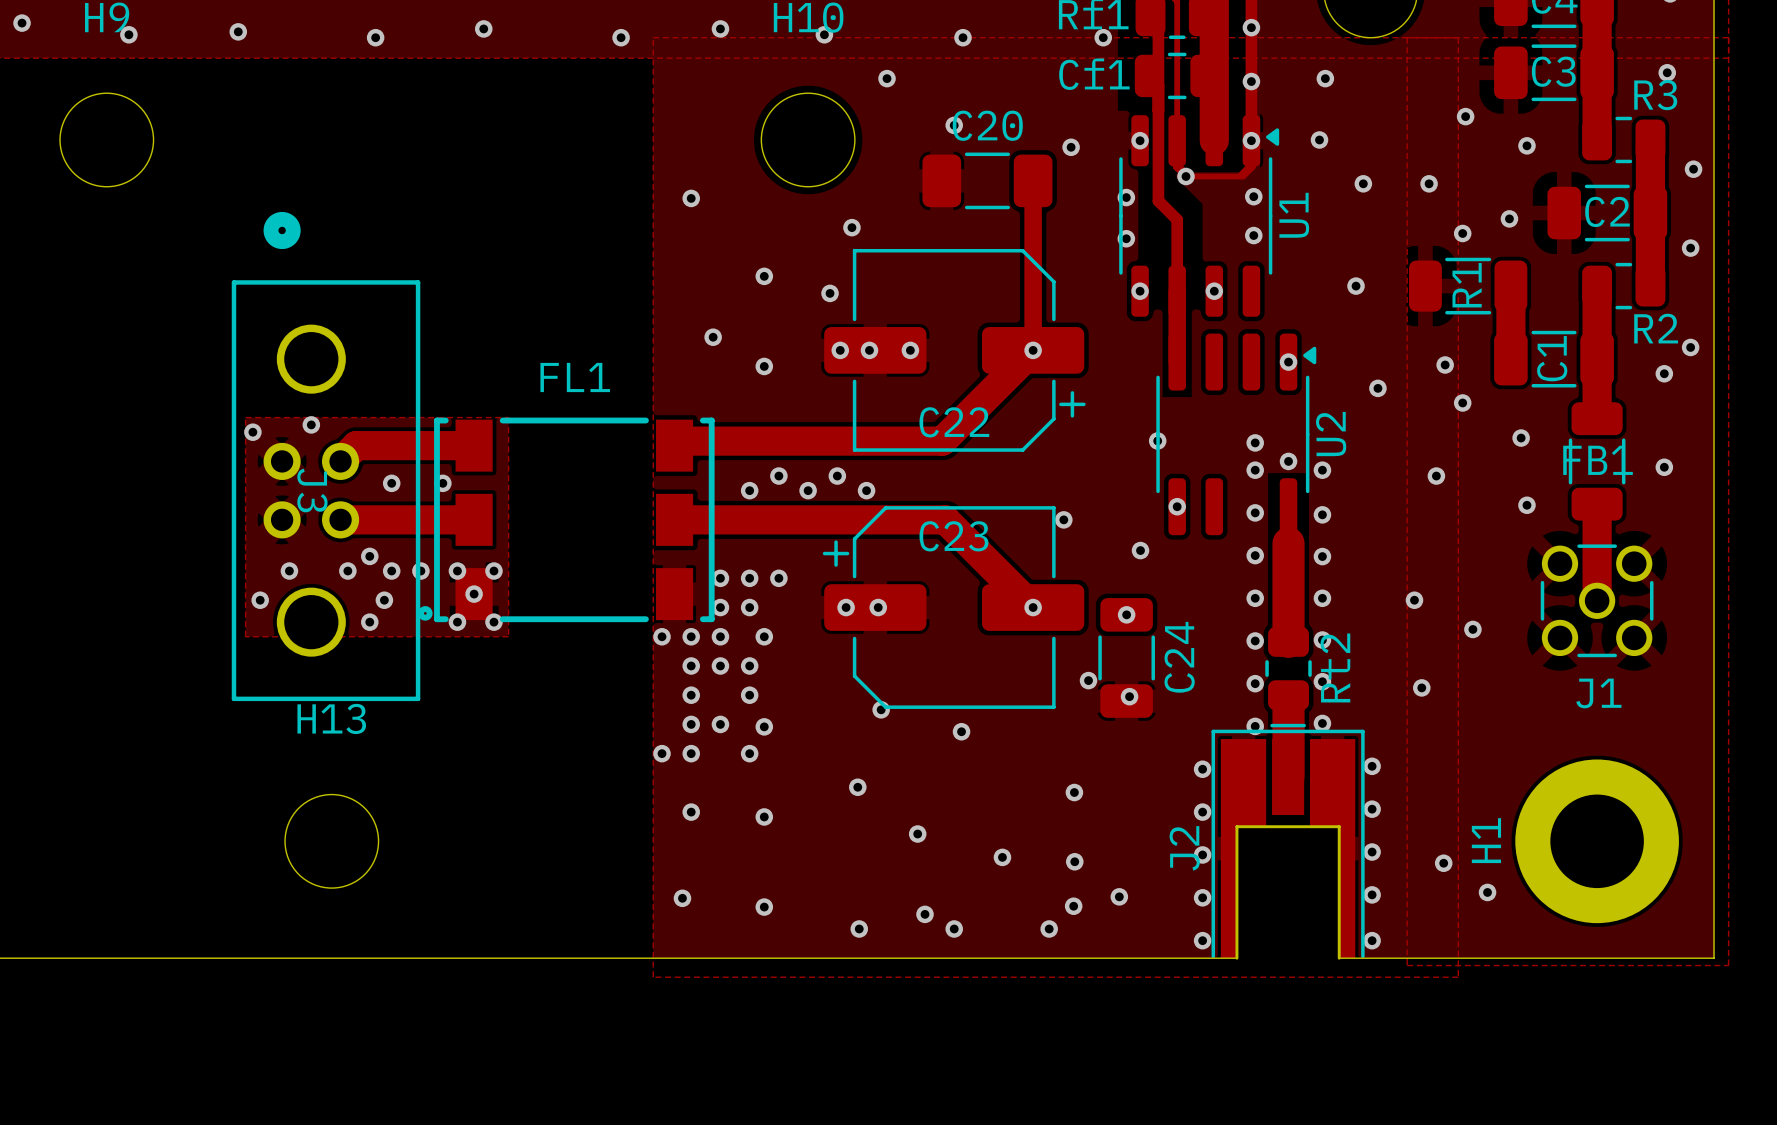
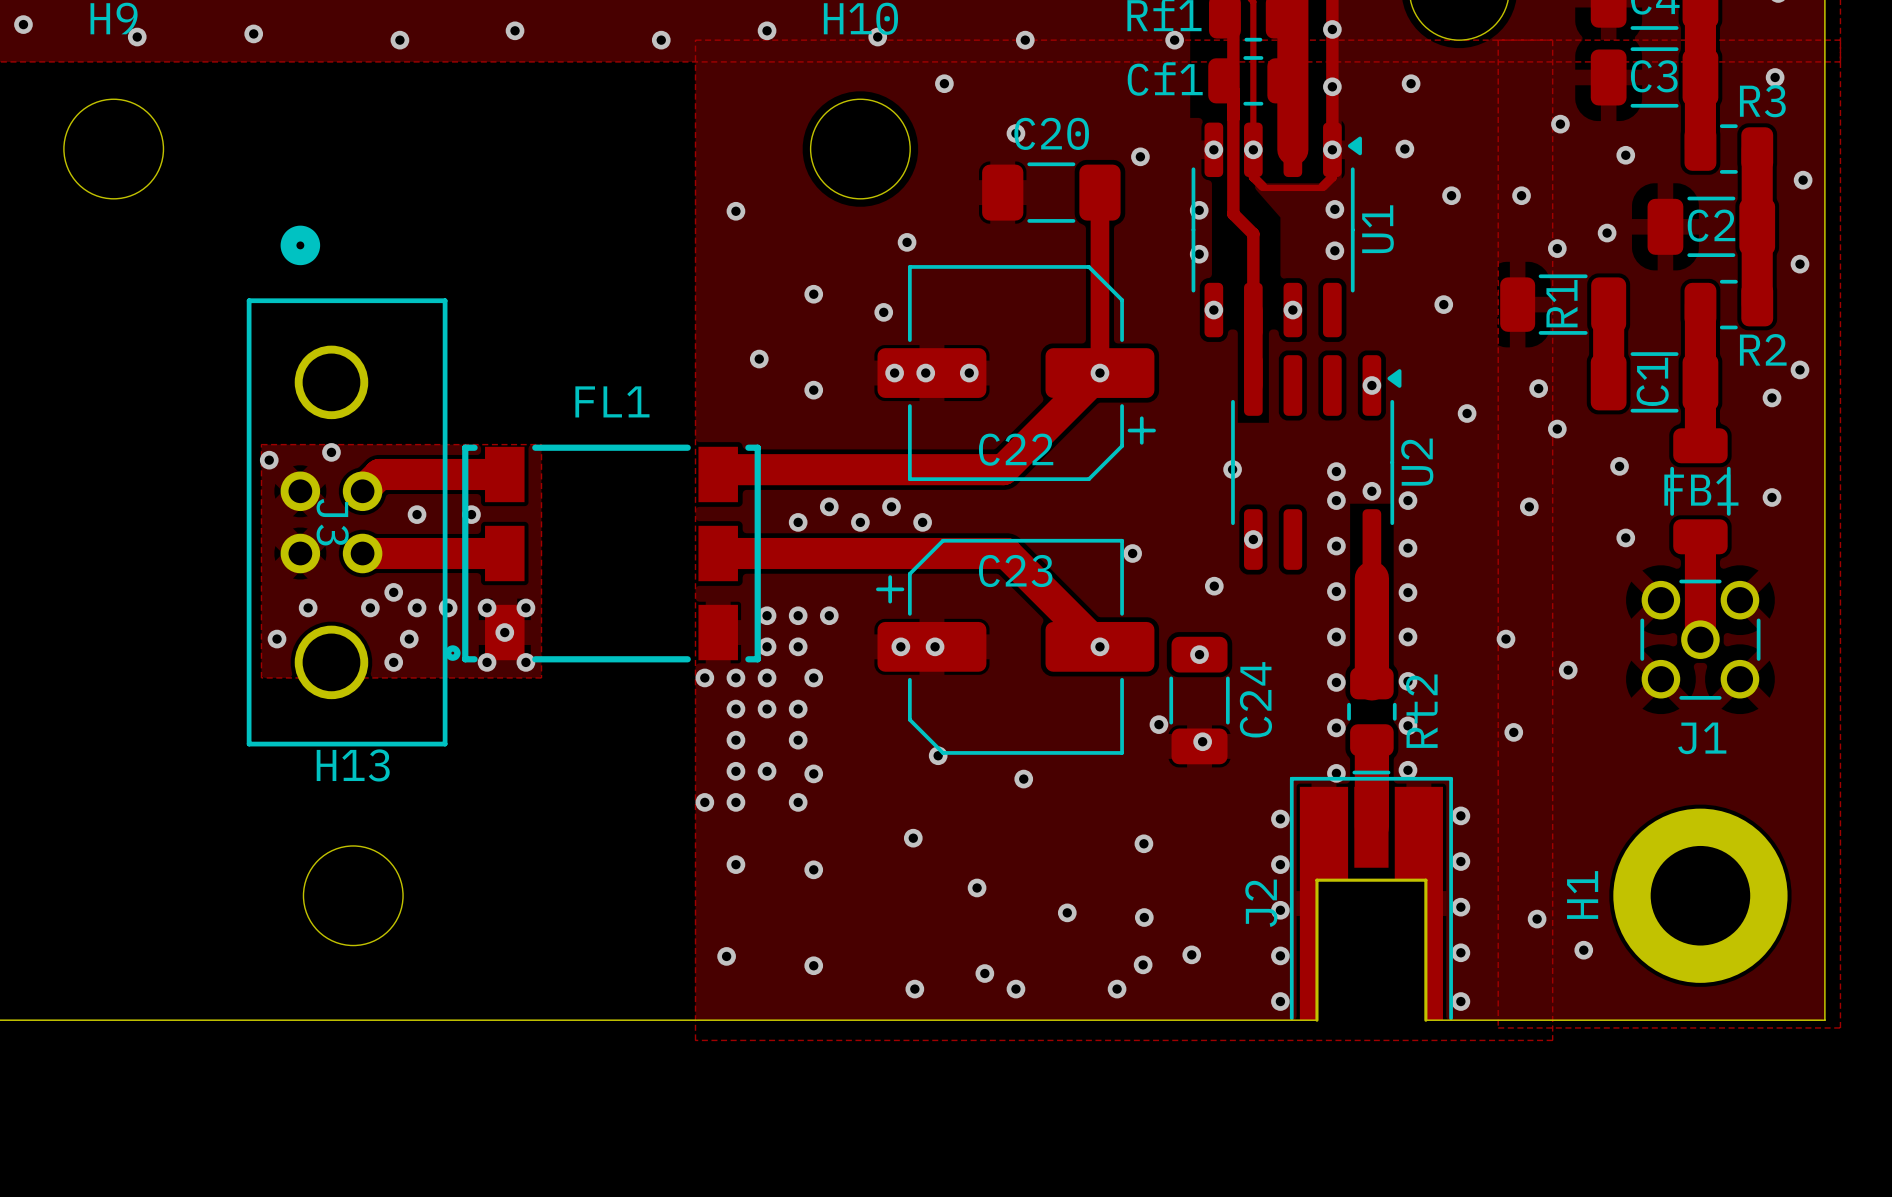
via position: (1185, 176) -> (1253, 149)

